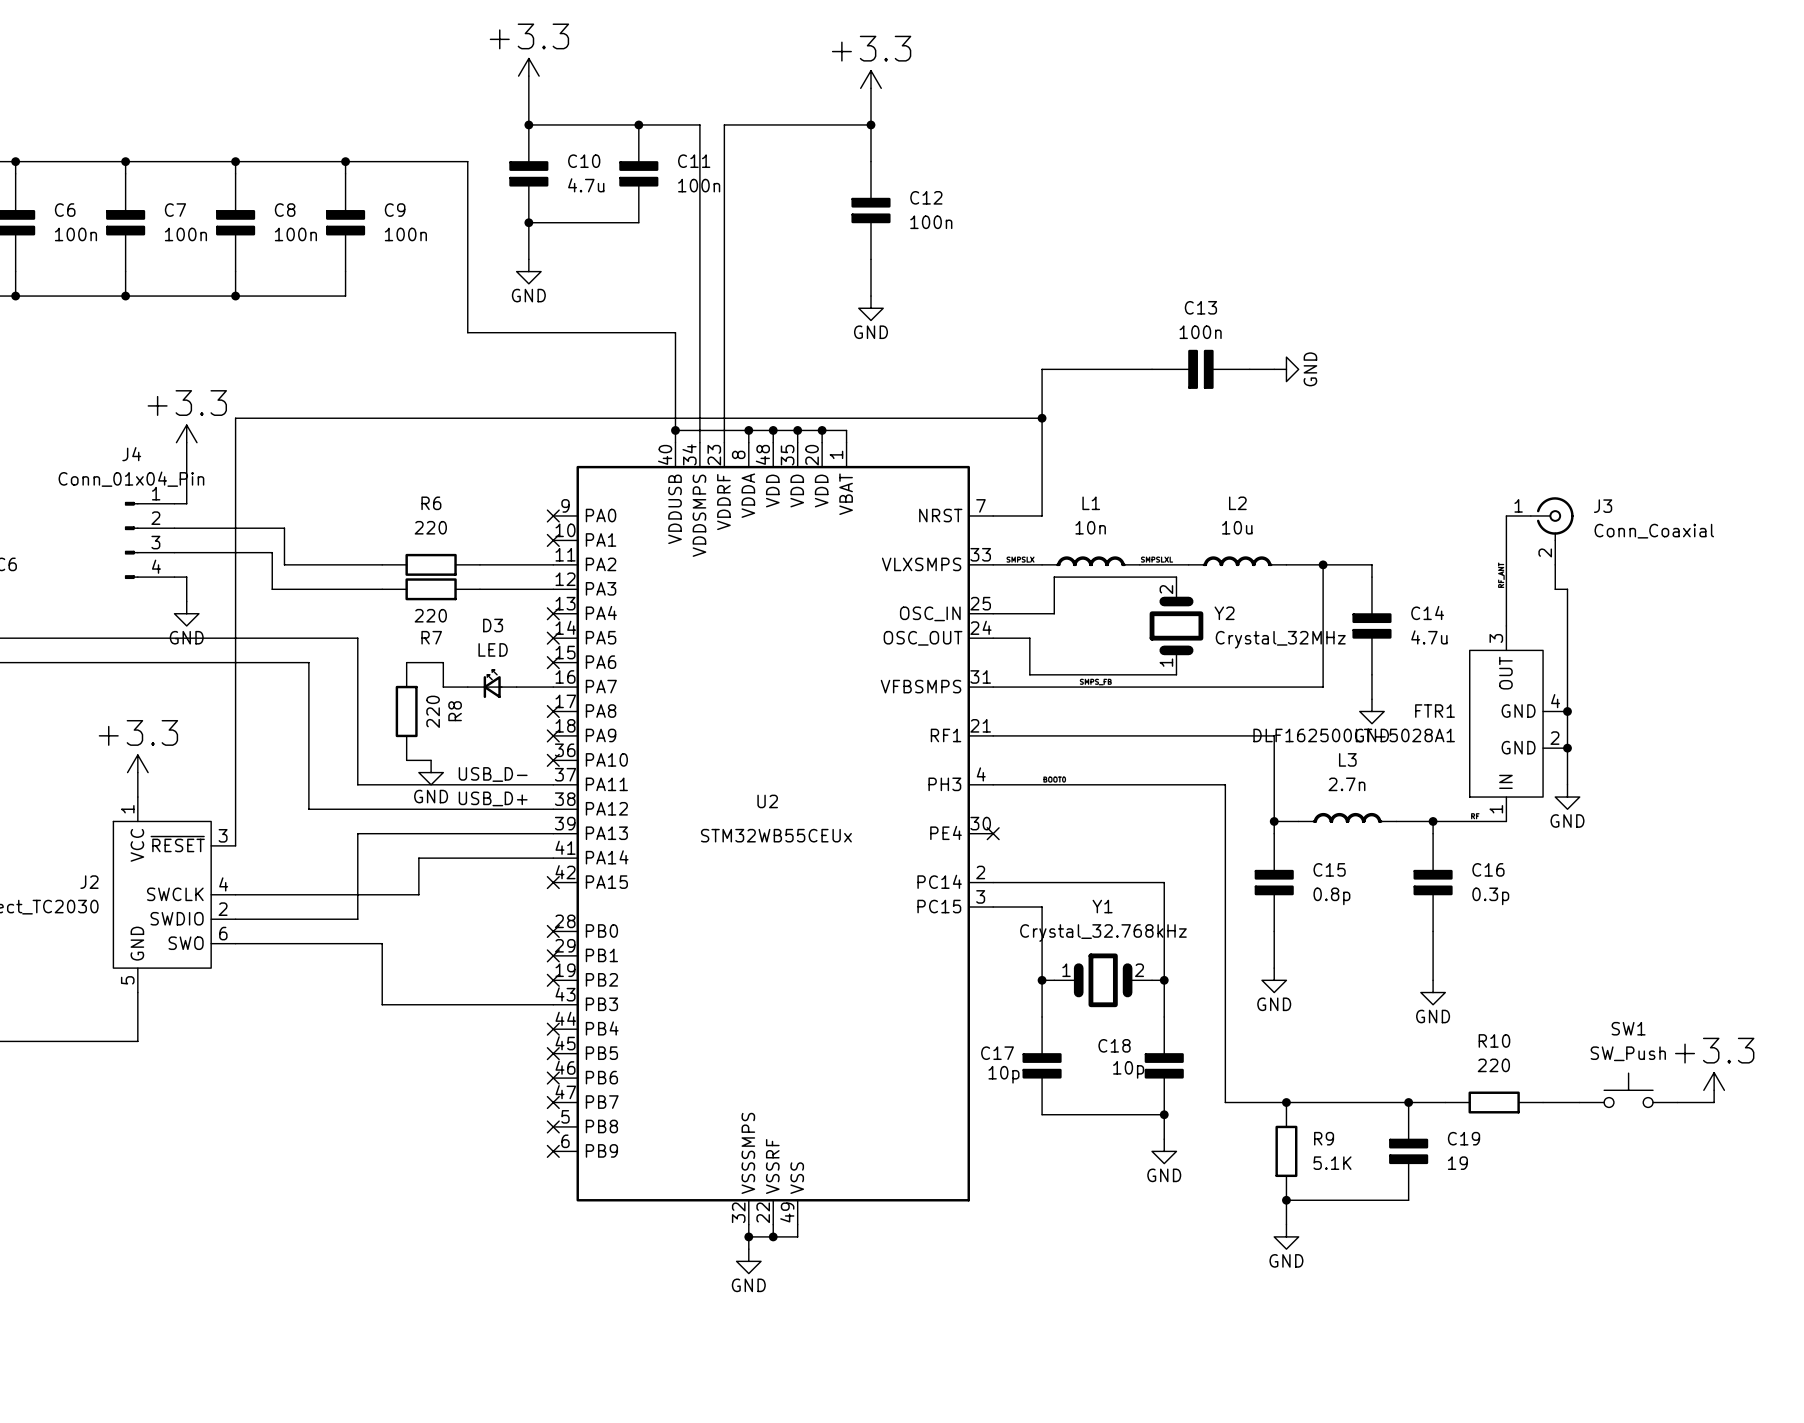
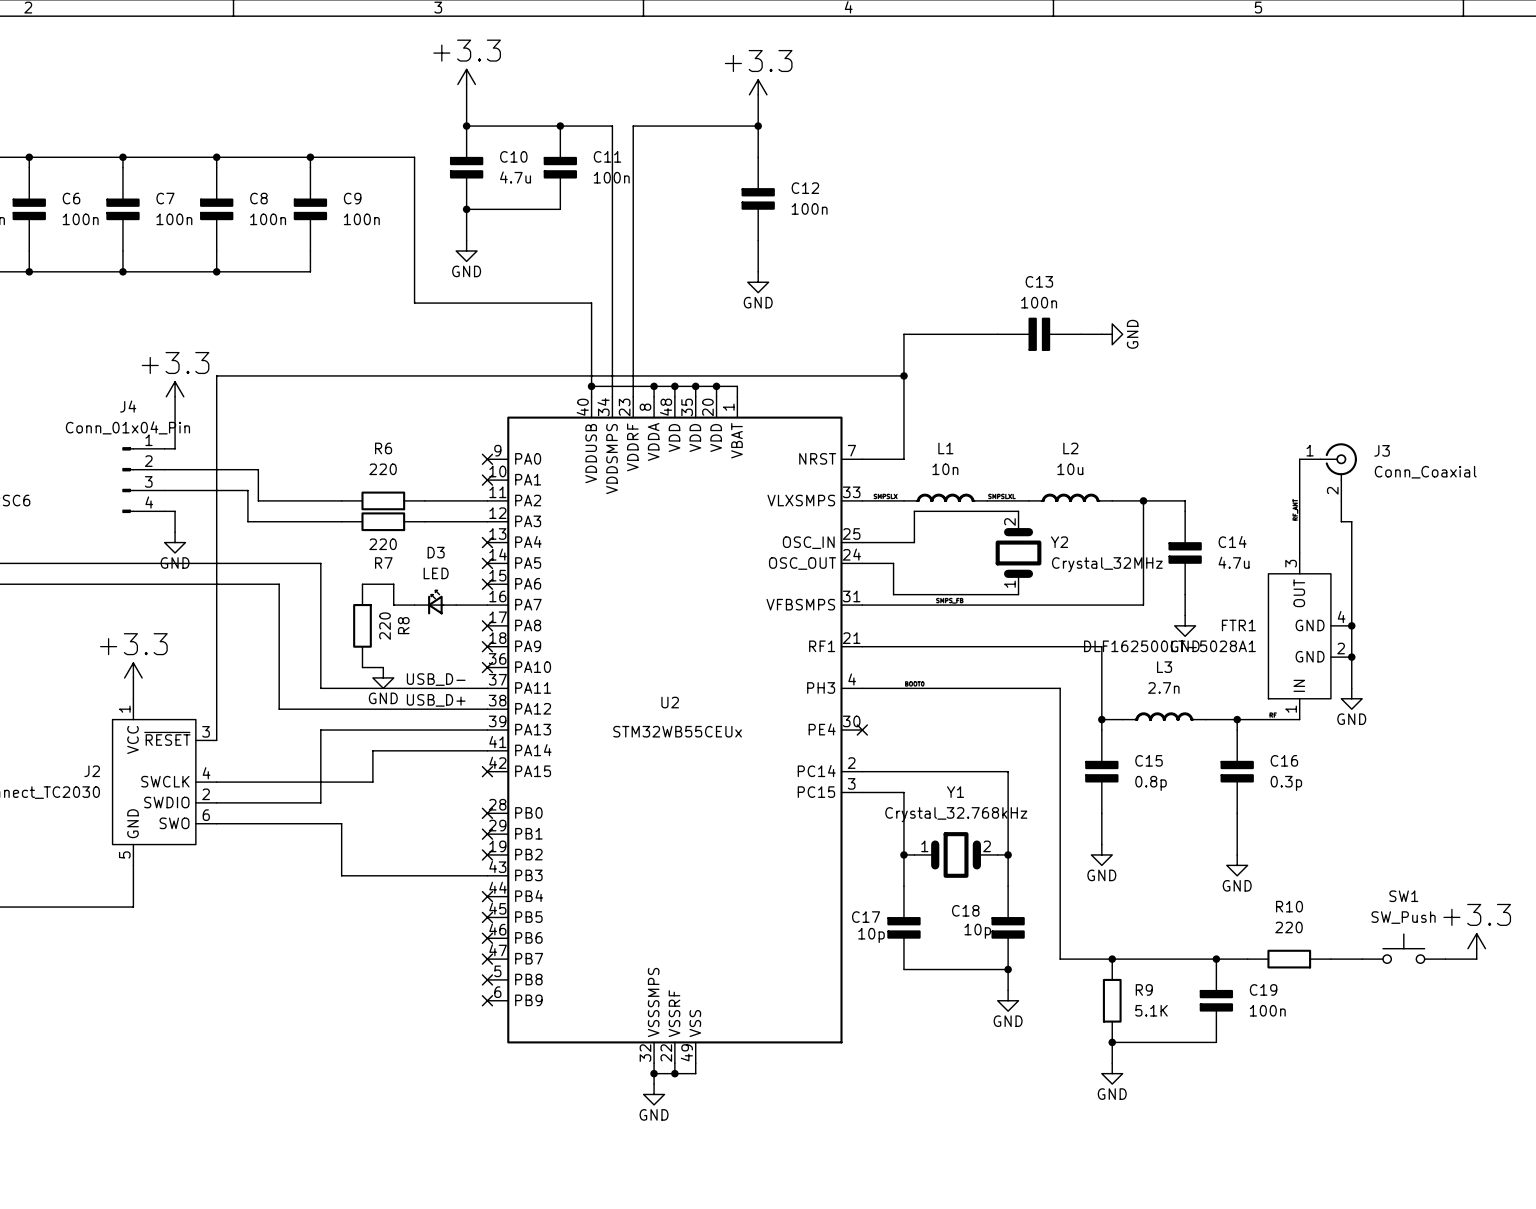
C19 value: 19 (1457, 1163) -> 100n (1267, 1010)

